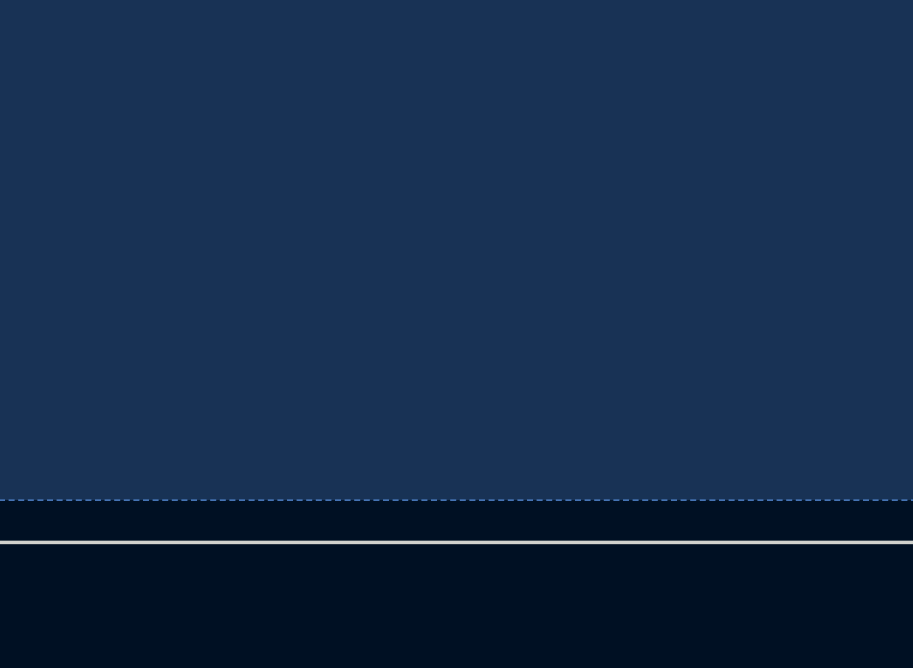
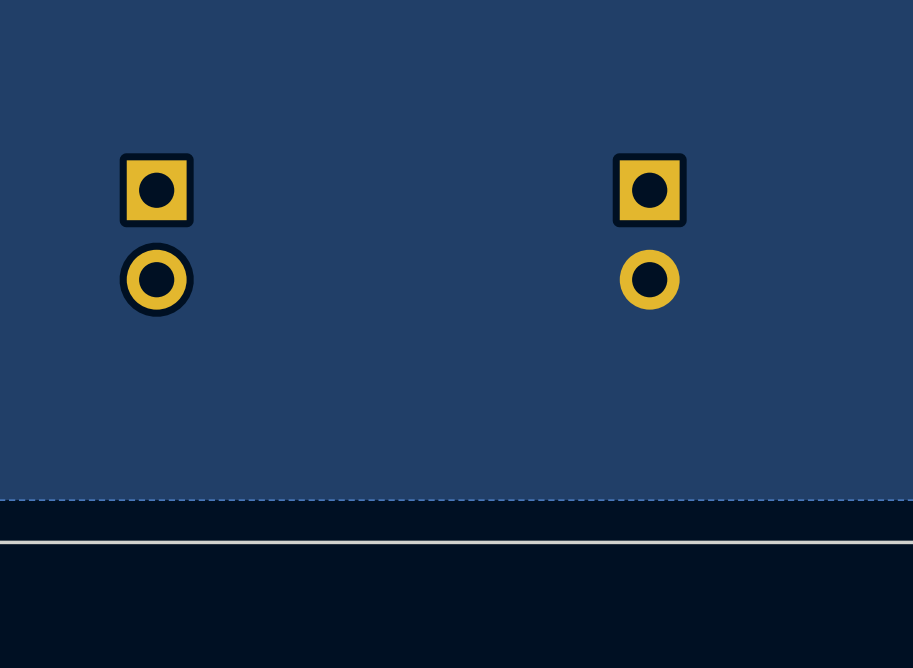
part: none -> (156, 234)
part: none -> (649, 234)

